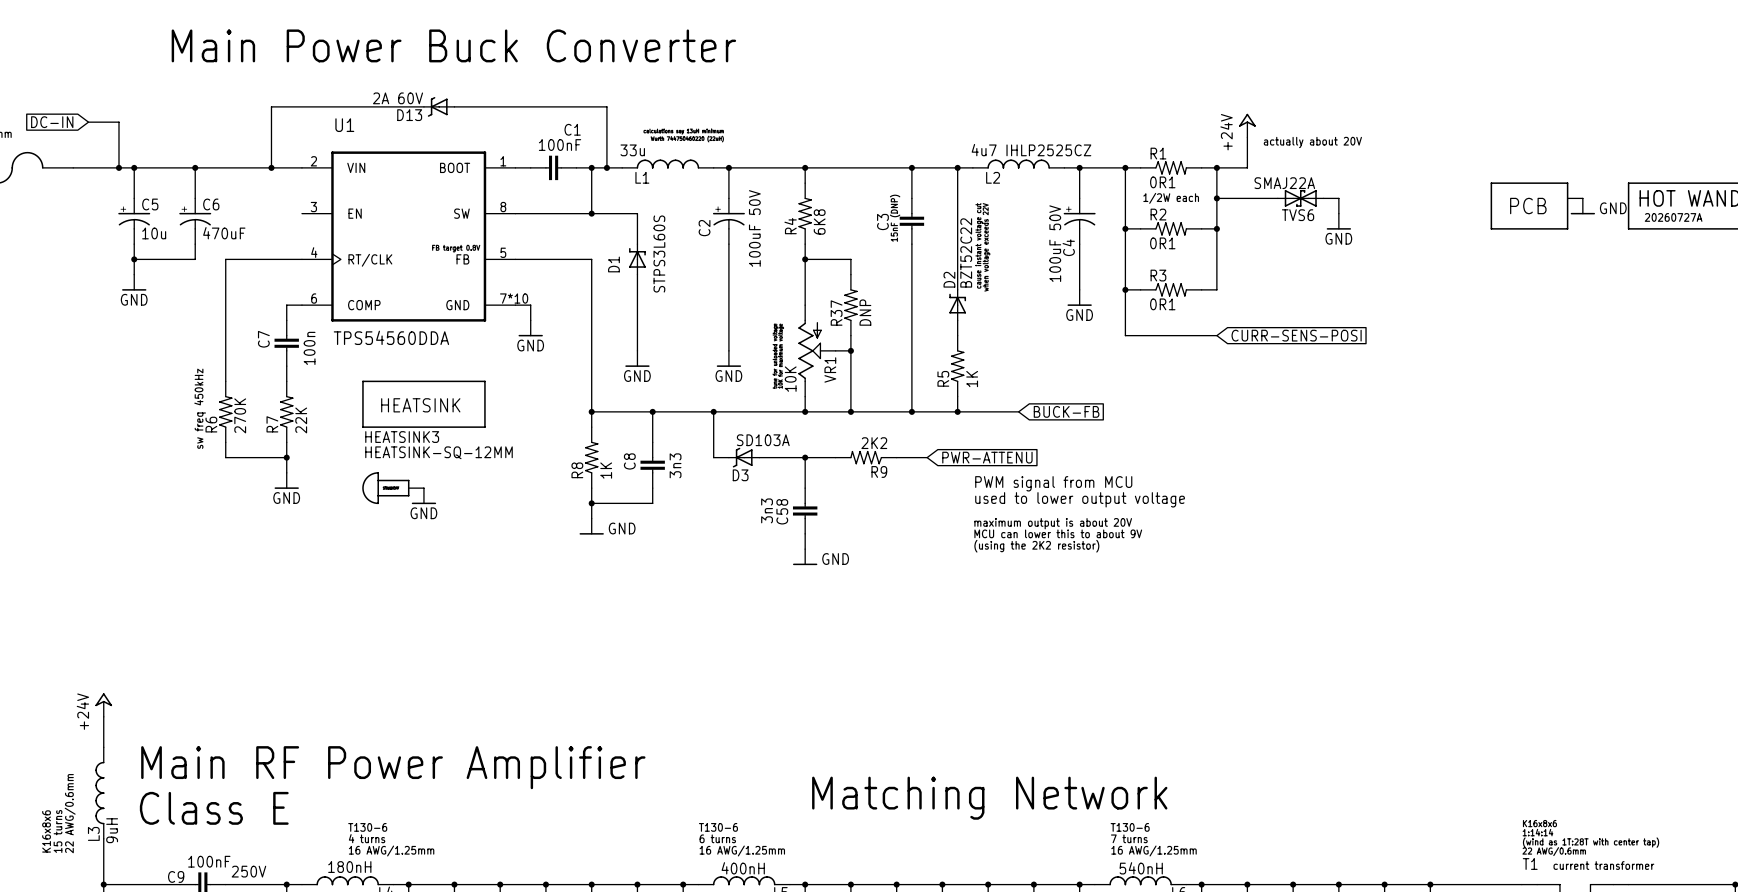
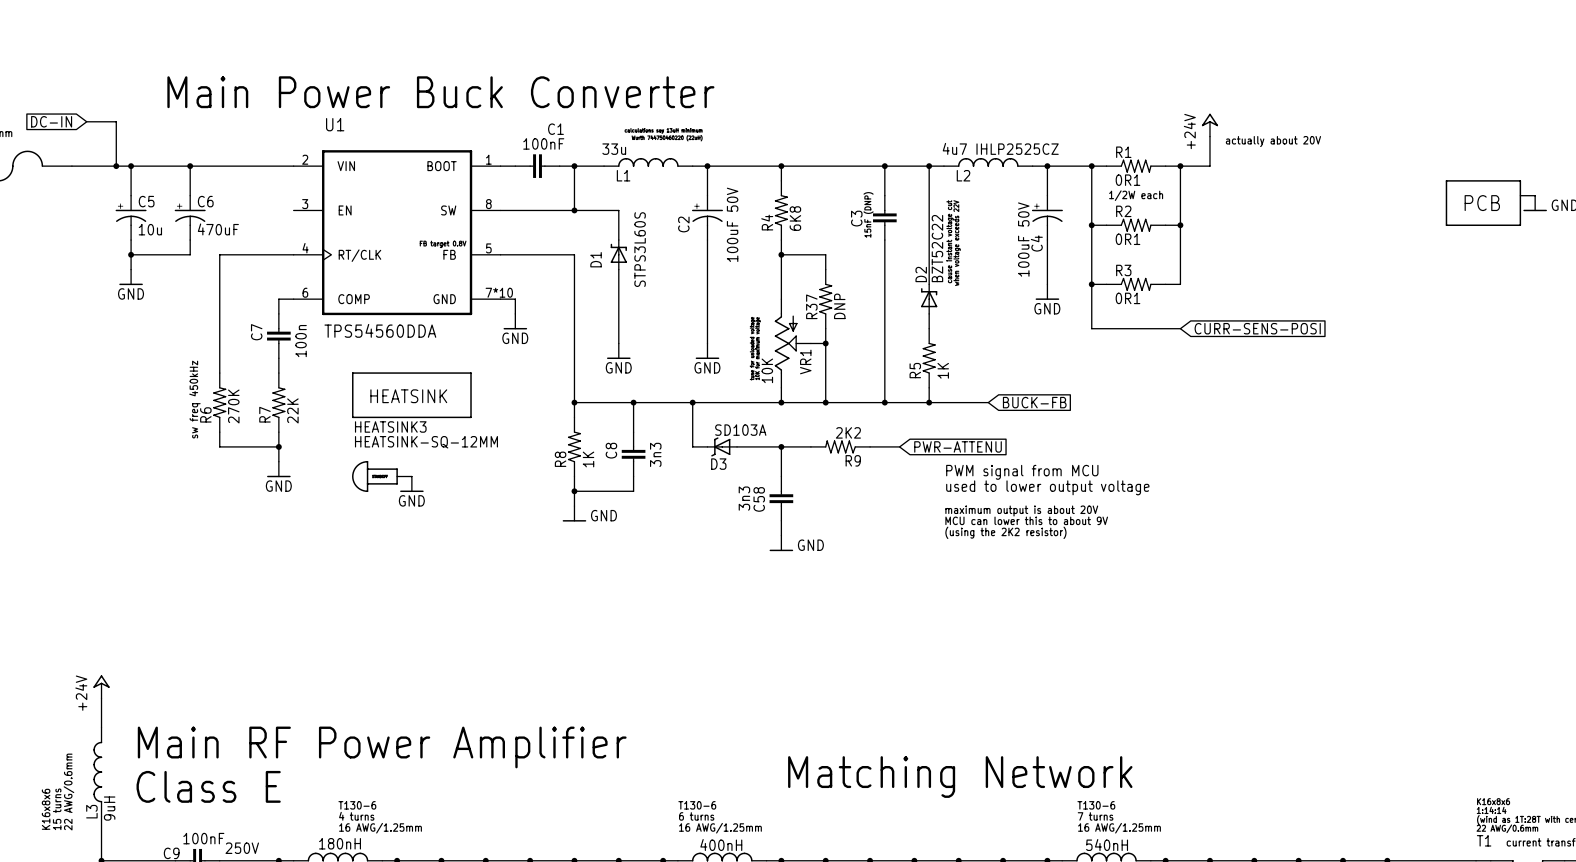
text position: Main Power Buck Converter (453, 45) -> Main Power Buck Converter (440, 92)
wire: (423, 106) (271, 106) (271, 167) -> none
D13: 2A 60V (439, 106) -> none
wire: (454, 106) (606, 106) (606, 167) -> none
junction: (271, 167) -> none
junction: (606, 167) -> none
wire: (1216, 198) (1277, 198) -> none
junction: (1216, 198) -> none
TVS6: SMAJ22A (1300, 198) -> none
wire: (1323, 198) (1338, 198) (1338, 213) -> none
power symbol: GND (1338, 221) -> none

